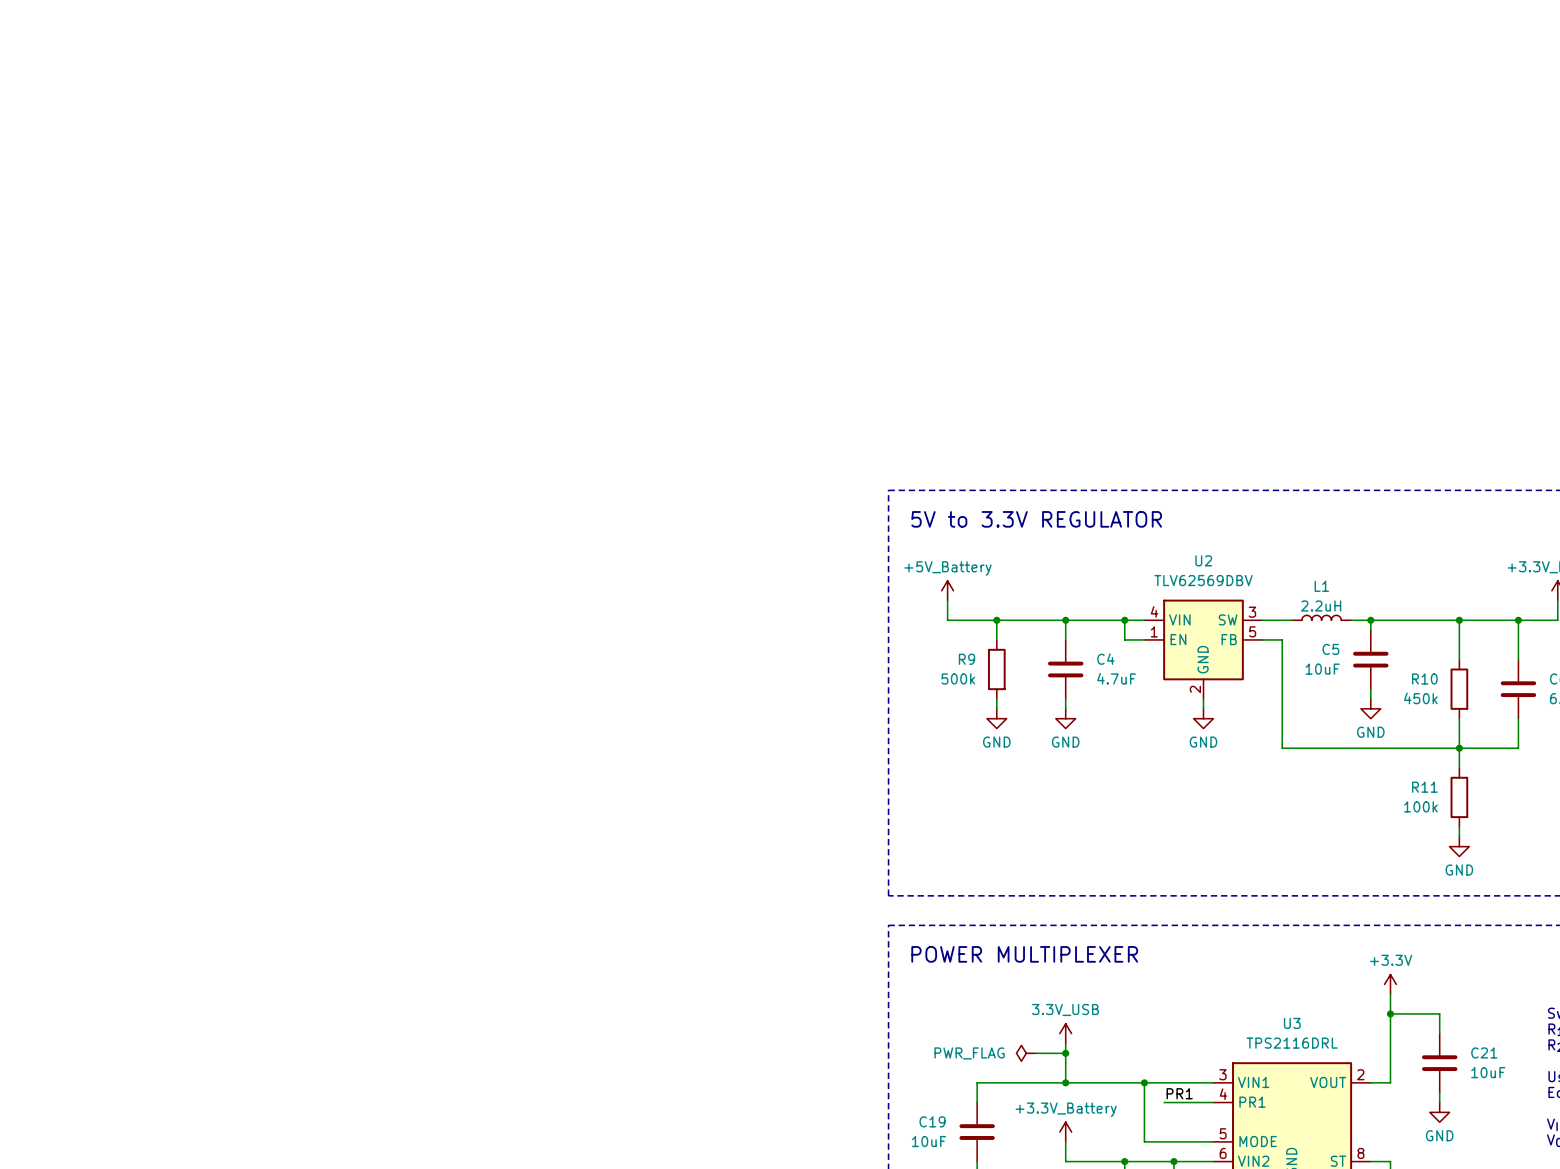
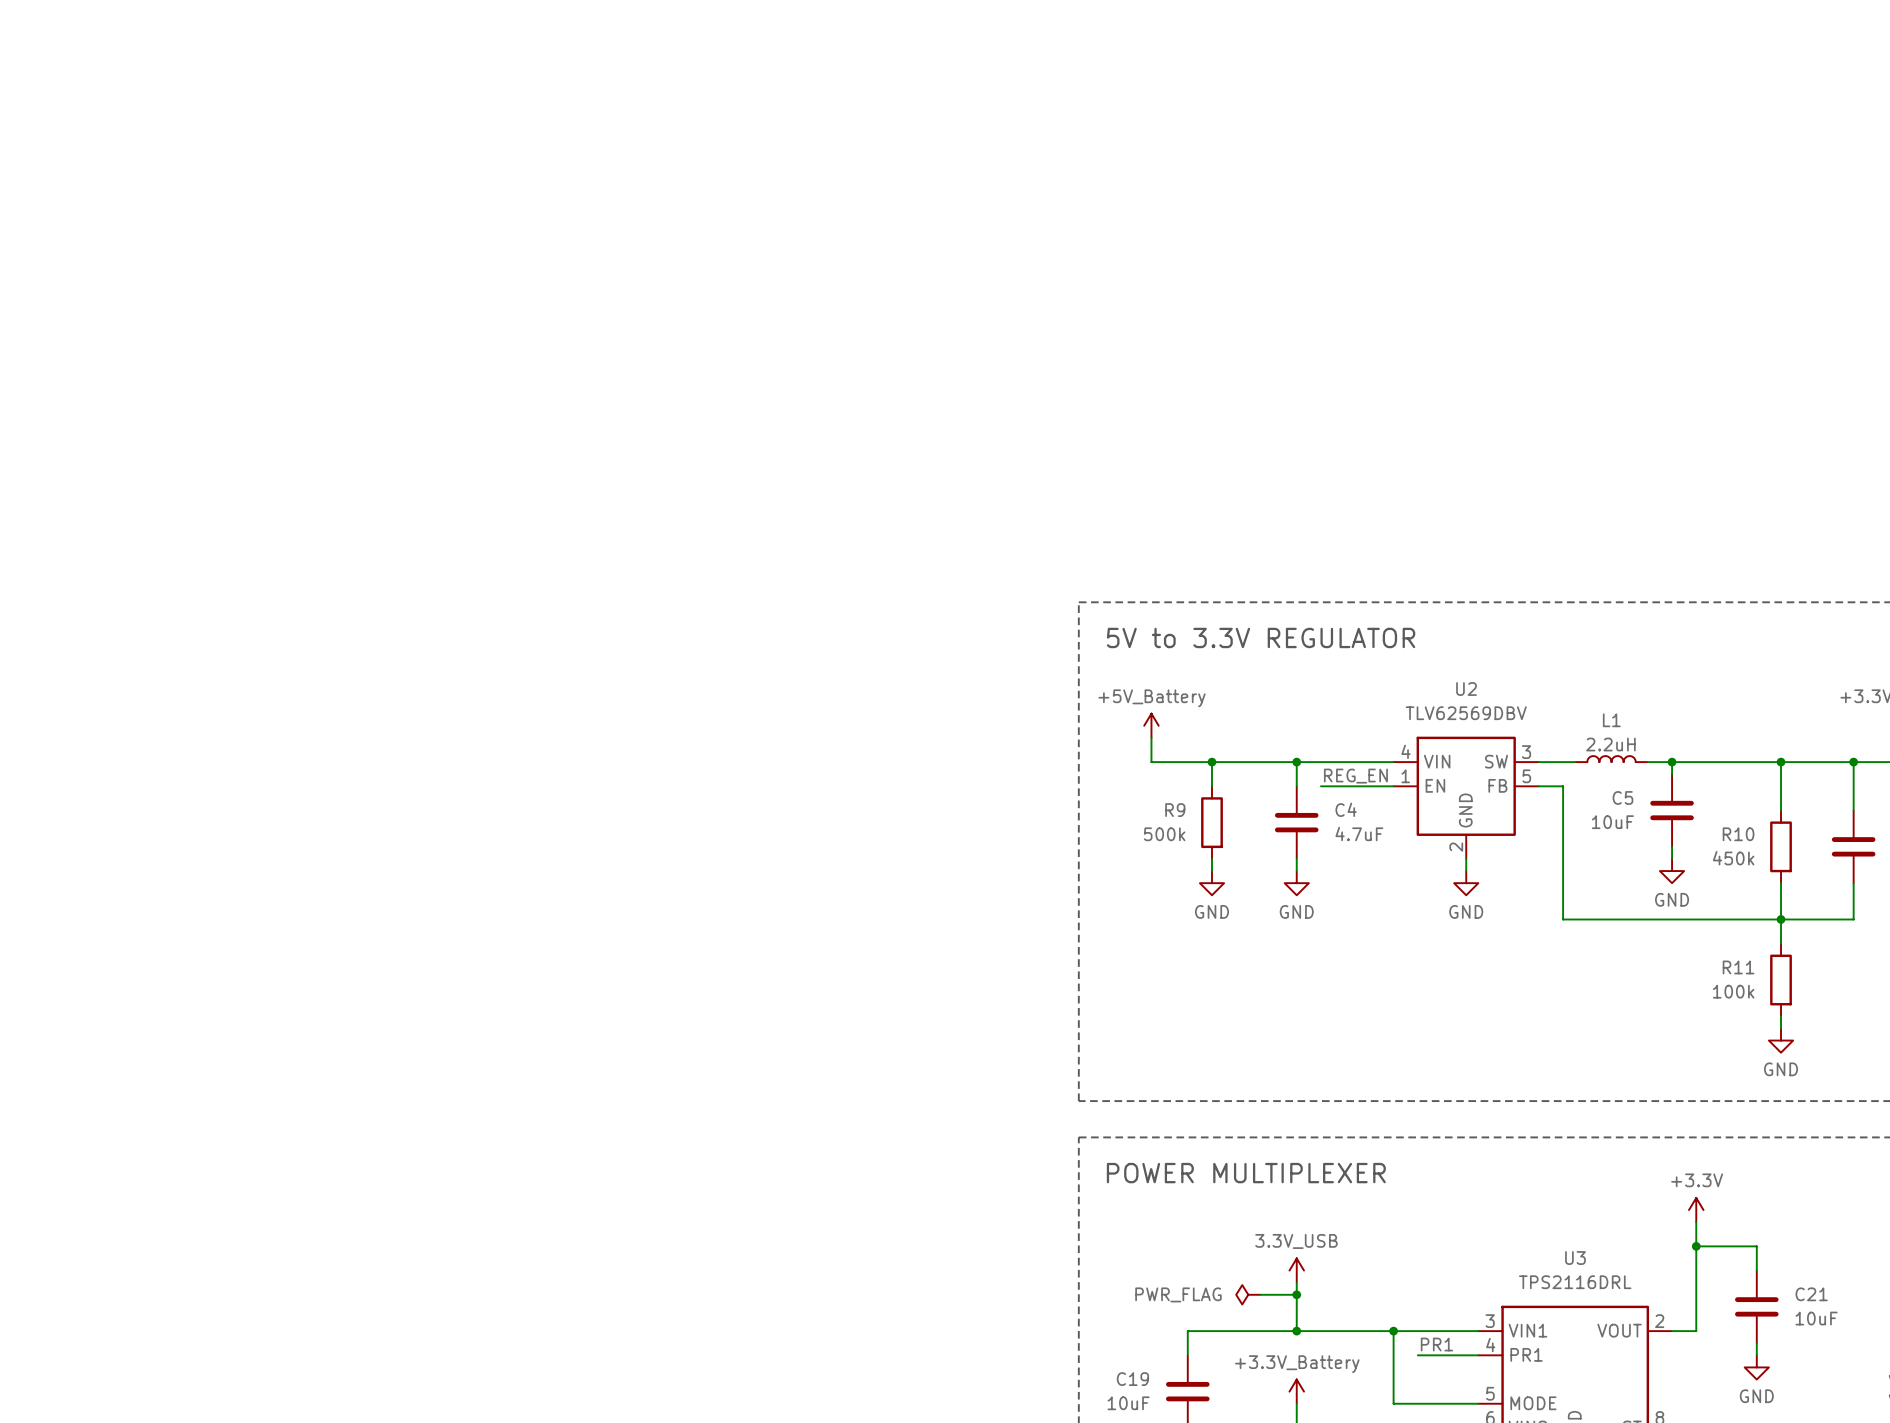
wire: (1124, 620) (1124, 639) -> (1320, 786) (1369, 786)
junction: (1124, 620) -> none
label: none -> REG_EN (1355, 776)

